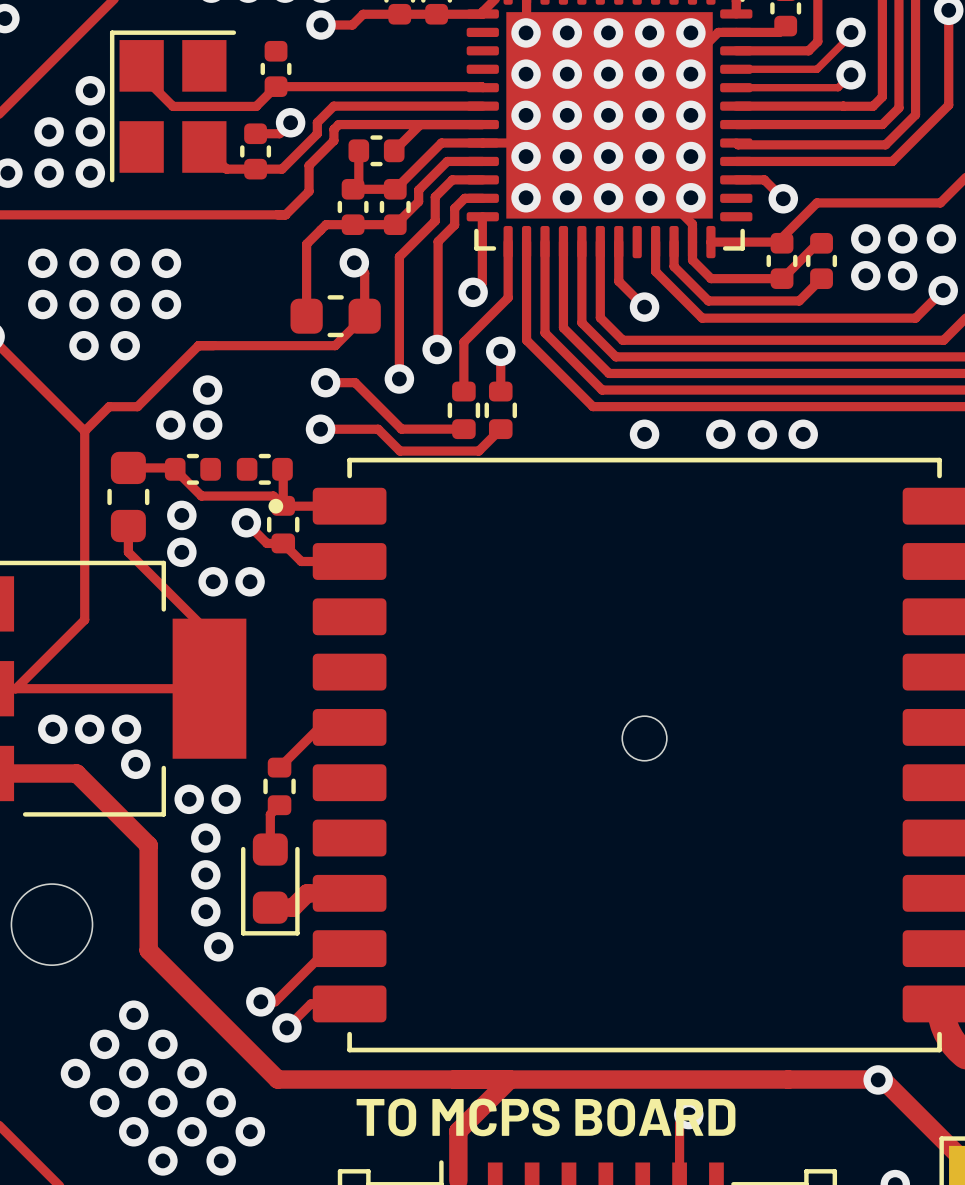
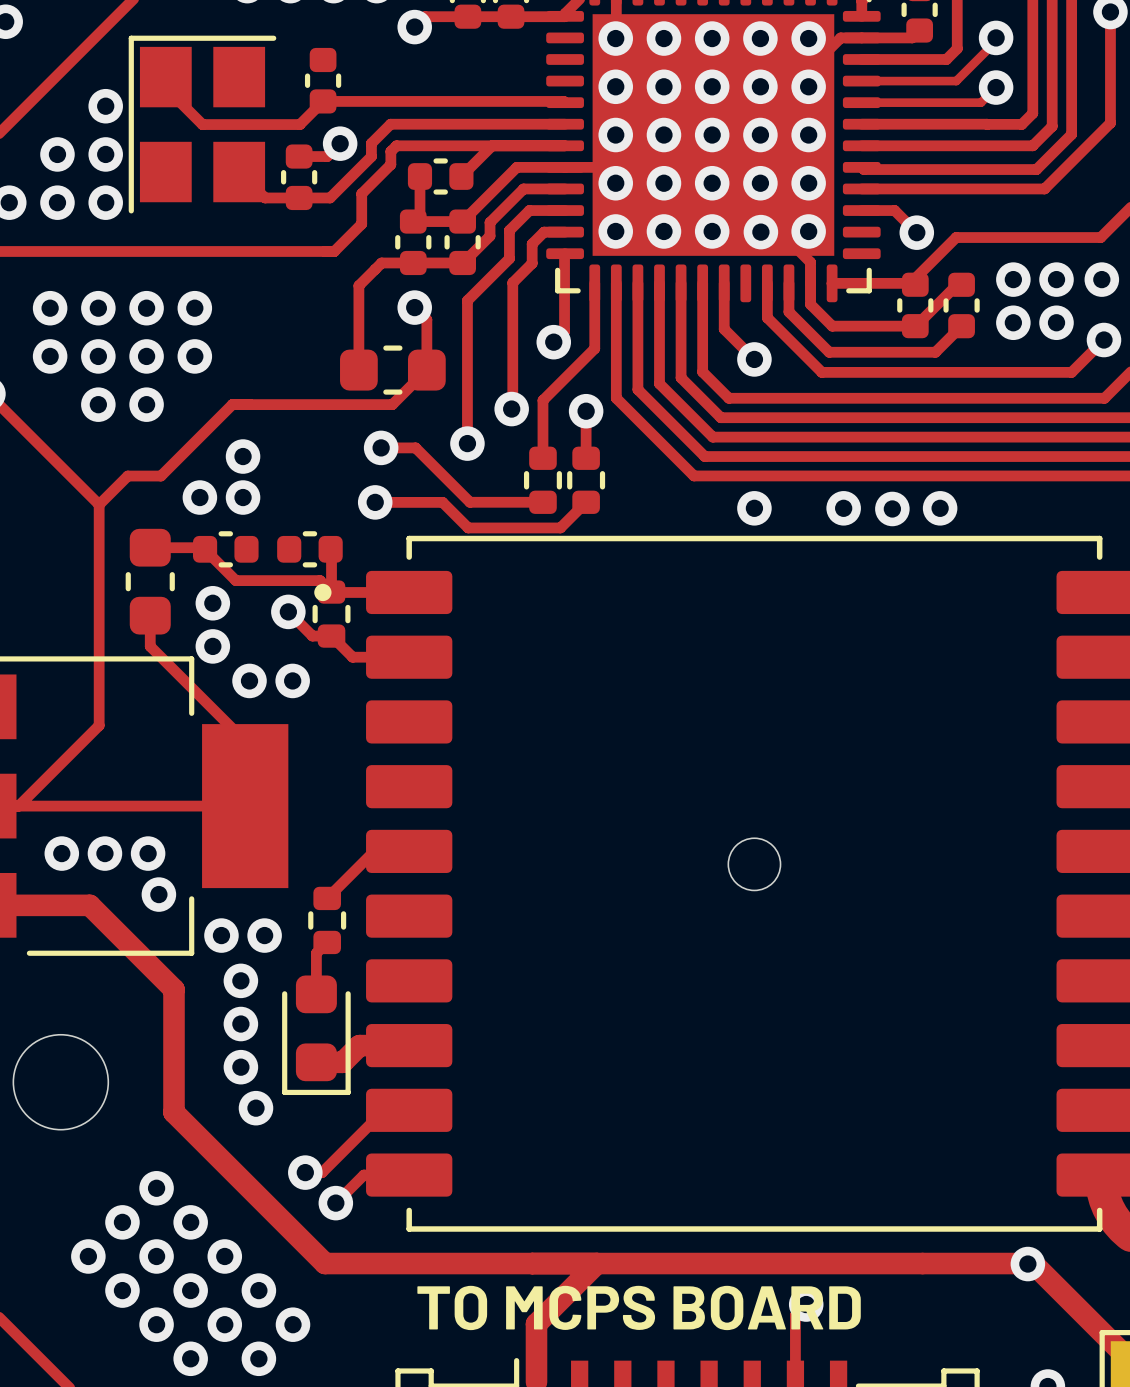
track: (354, 23) (352, 25) (321, 25) -> none
via position: (321, 25) -> (414, 27)

